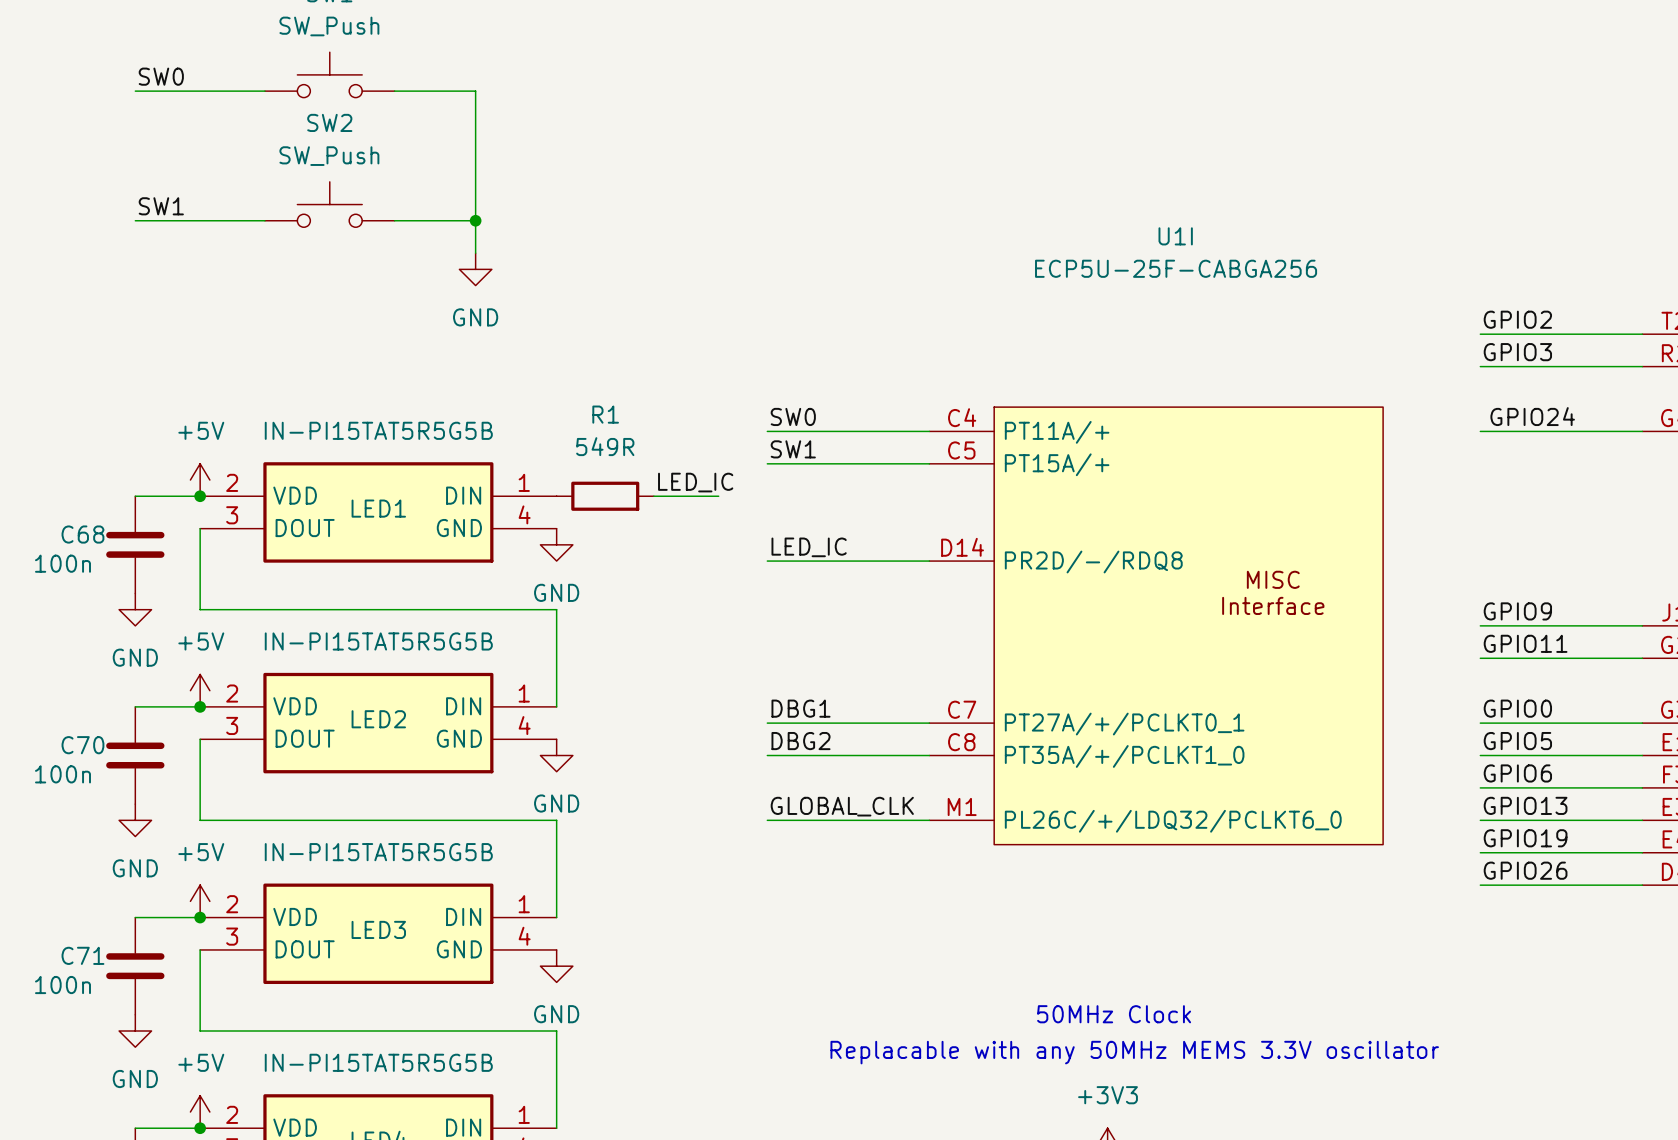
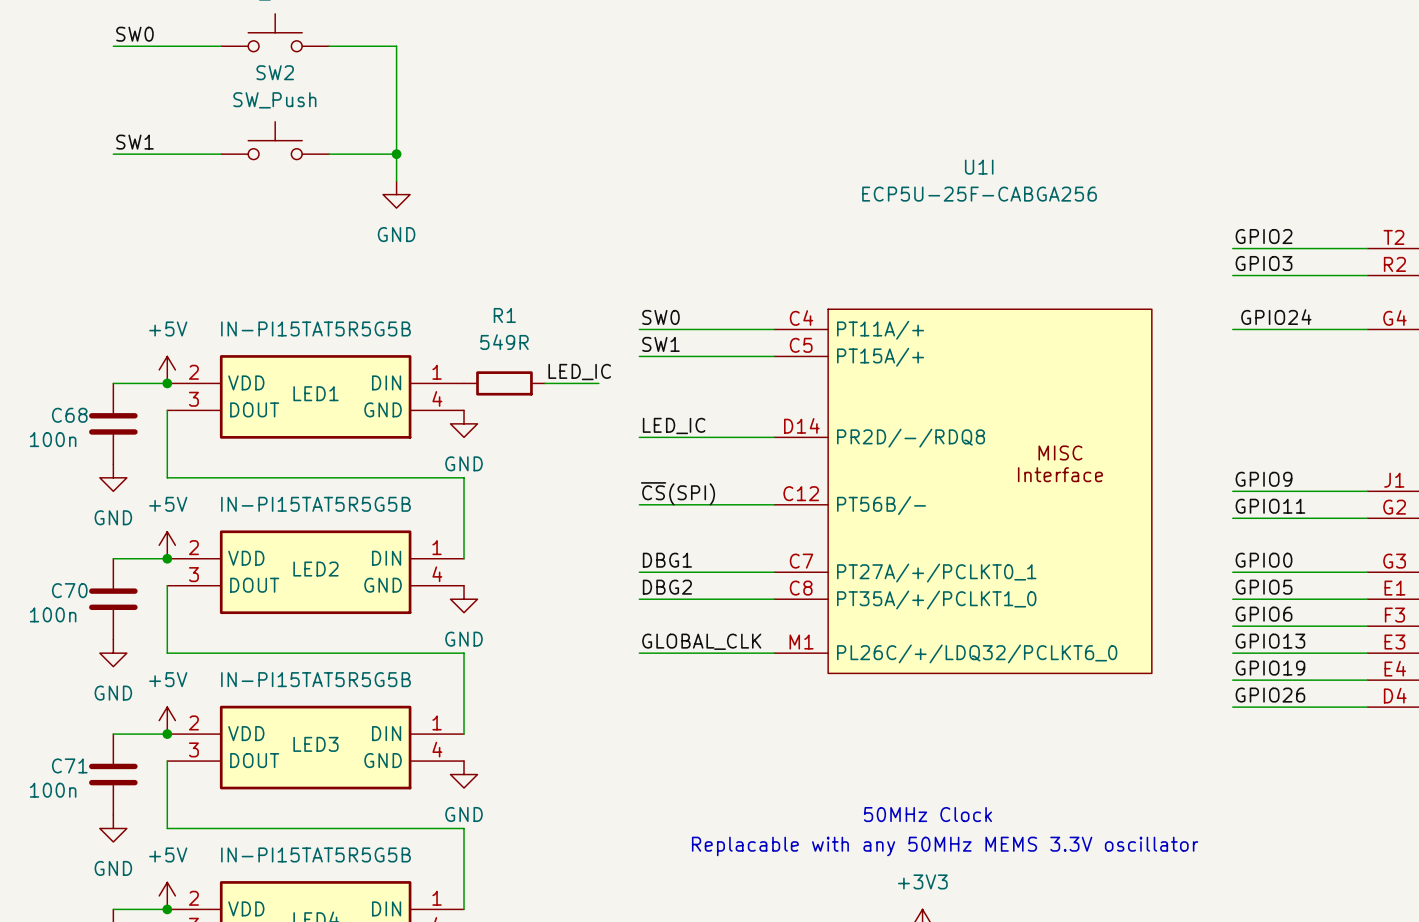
U1I symbol: [929, 407, 1384, 845] -> [774, 309, 1152, 674]
label: none -> ~{CS}(SPI) (678, 493)
wire: none -> (639, 504) (774, 504)

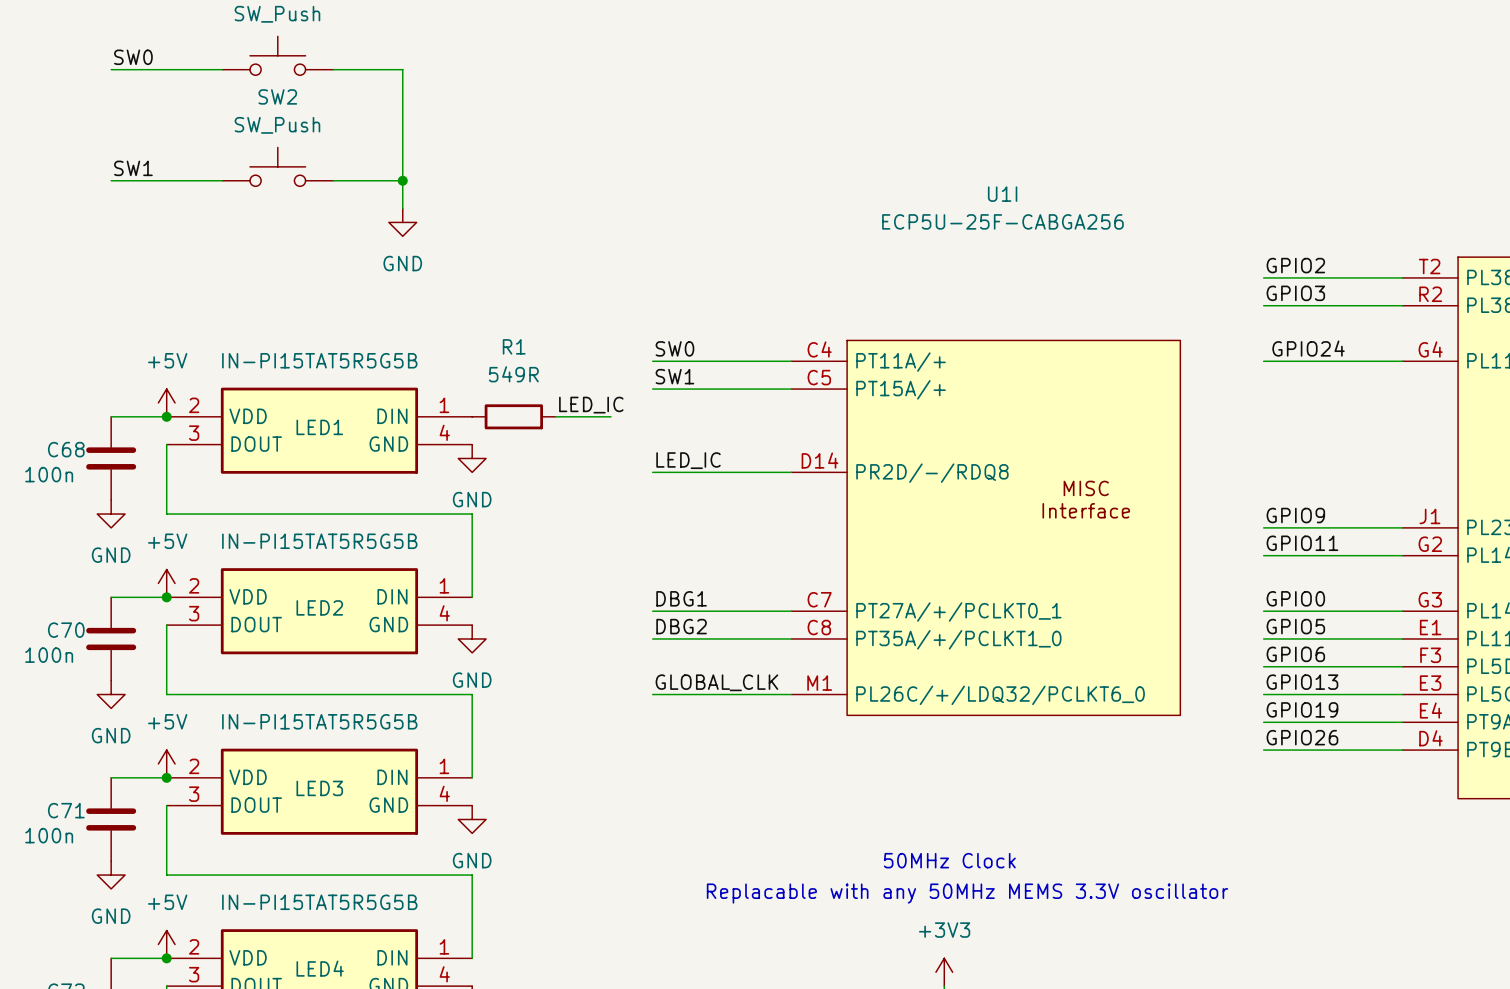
U1I symbol: [774, 309, 1152, 674] -> [791, 340, 1181, 716]
label: ~{CS}(SPI) (678, 493) -> none
wire: (639, 504) (774, 504) -> none

